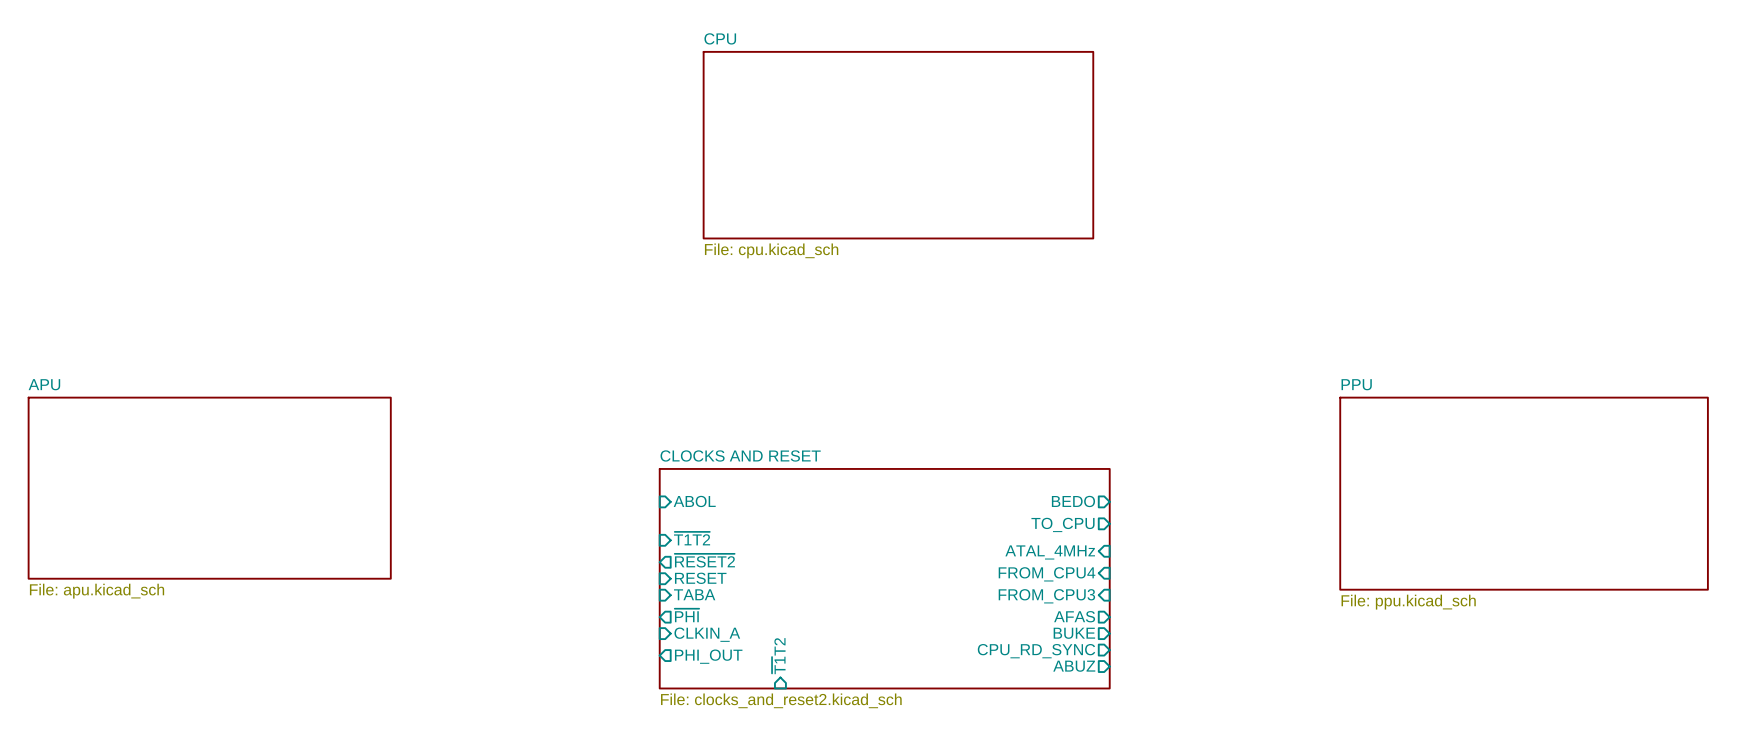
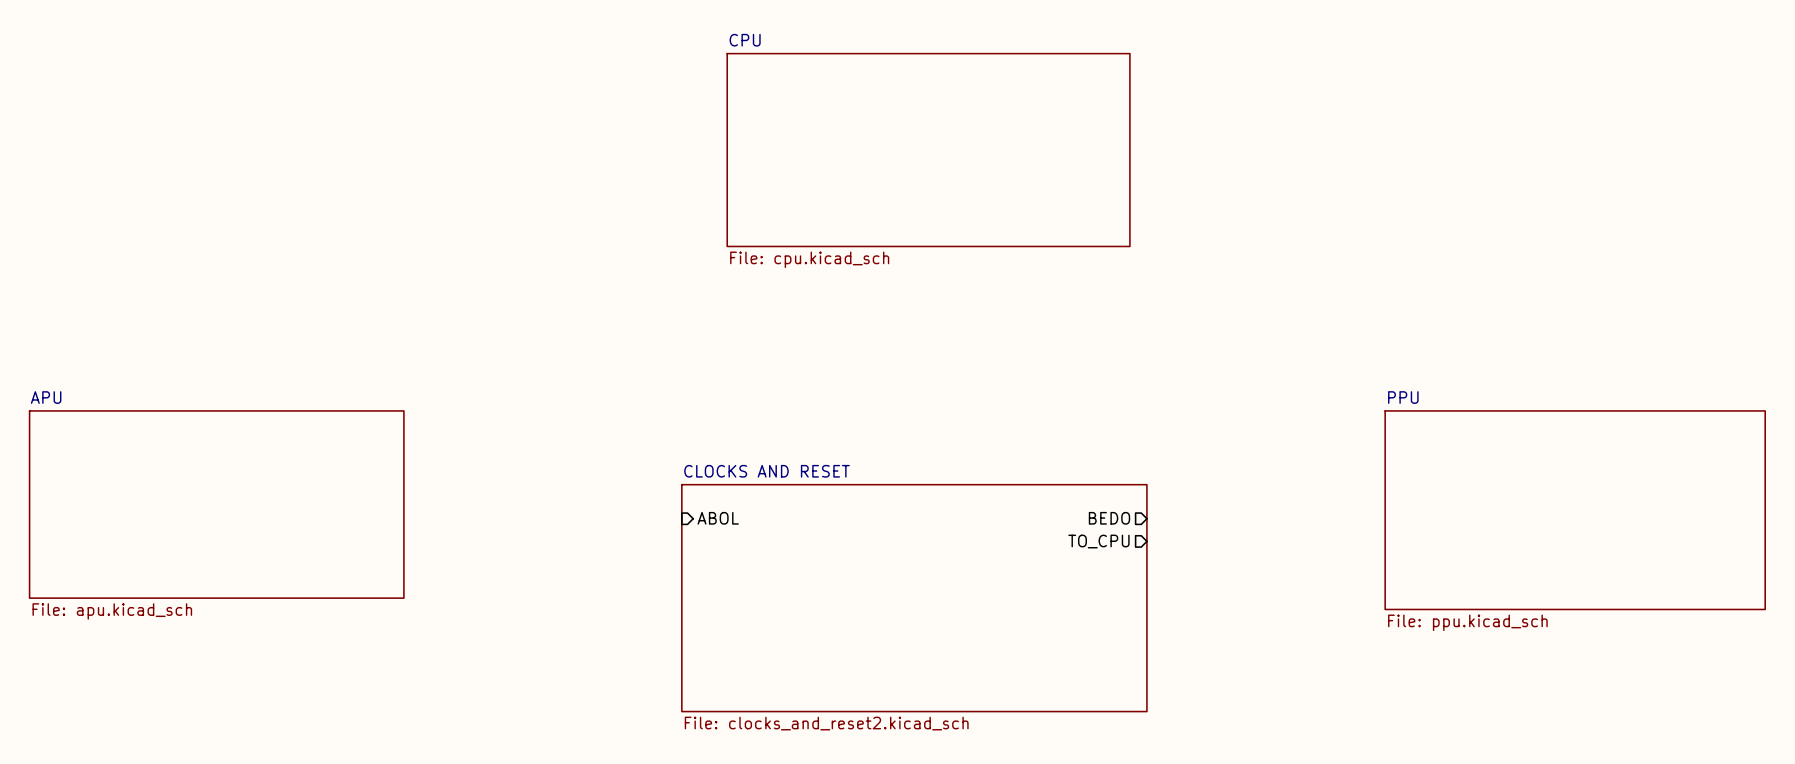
sheet pin: ~{T1T2} (692, 538) -> none
sheet pin: ATAL_4MHz (1050, 552) -> none
sheet pin: ~{RESET2} (704, 560) -> none
sheet pin: FROM_CPU4 (1047, 574) -> none
sheet pin: RESET (700, 578) -> none
sheet pin: TABA (694, 594) -> none
sheet pin: FROM_CPU3 (1046, 596) -> none
sheet pin: ~{PHI} (686, 615) -> none
sheet pin: AFAS (1074, 616) -> none
sheet pin: BUKE (1074, 633) -> none
sheet pin: CLKIN_A (707, 634) -> none
sheet pin: CPU_RD_SYNC (1036, 651) -> none
sheet pin: PHI_OUT (708, 656) -> none
sheet pin: ~{T1}T2 (778, 656) -> none
sheet pin: ABUZ (1074, 666) -> none

